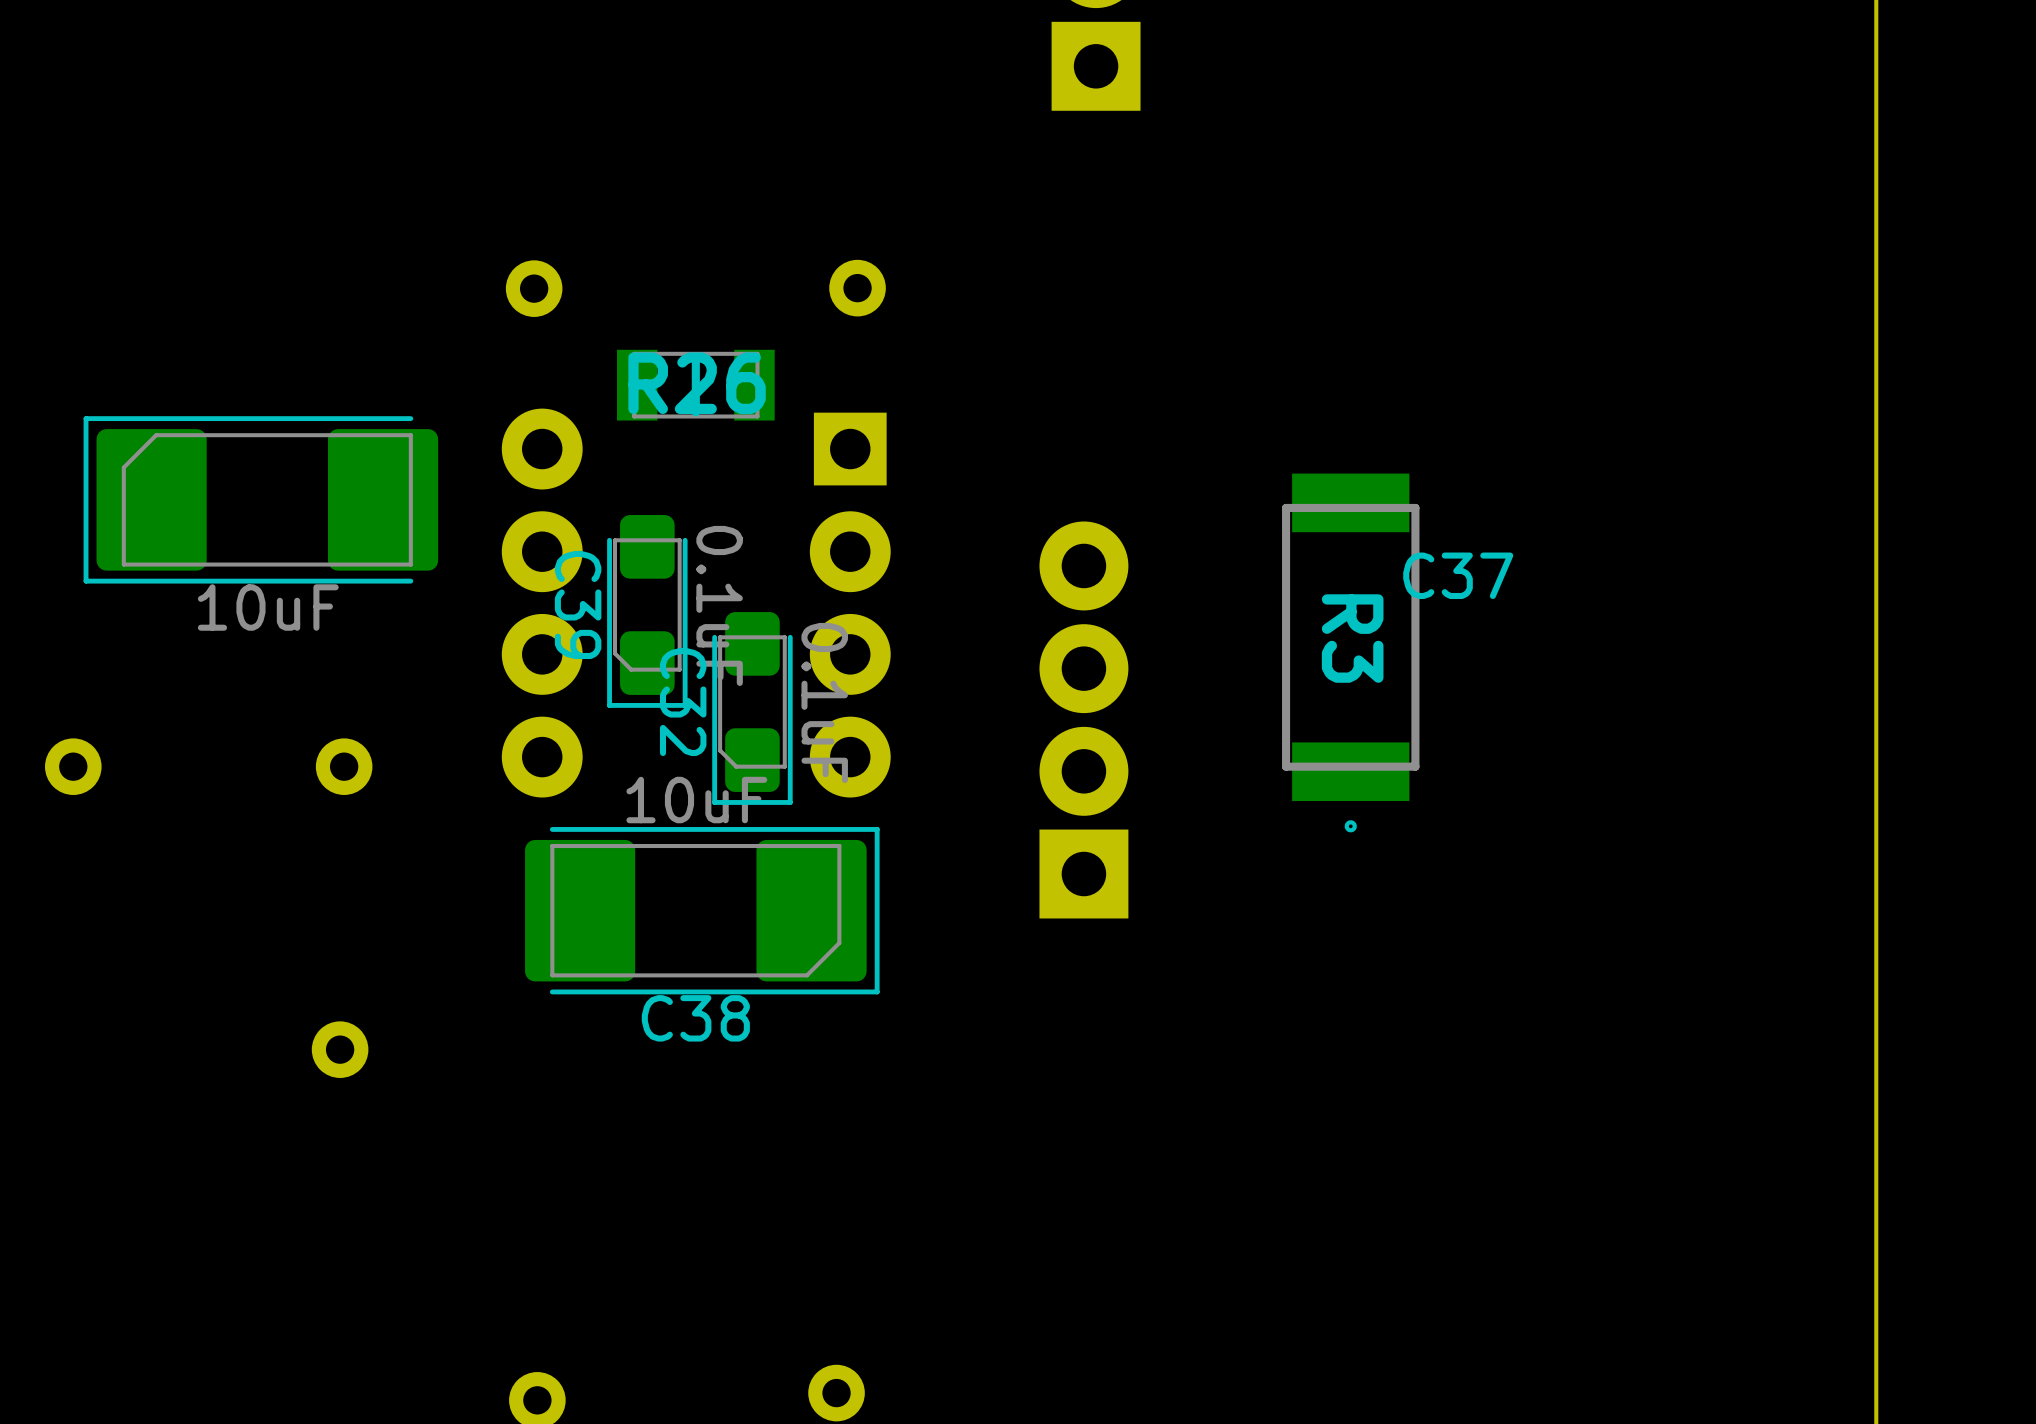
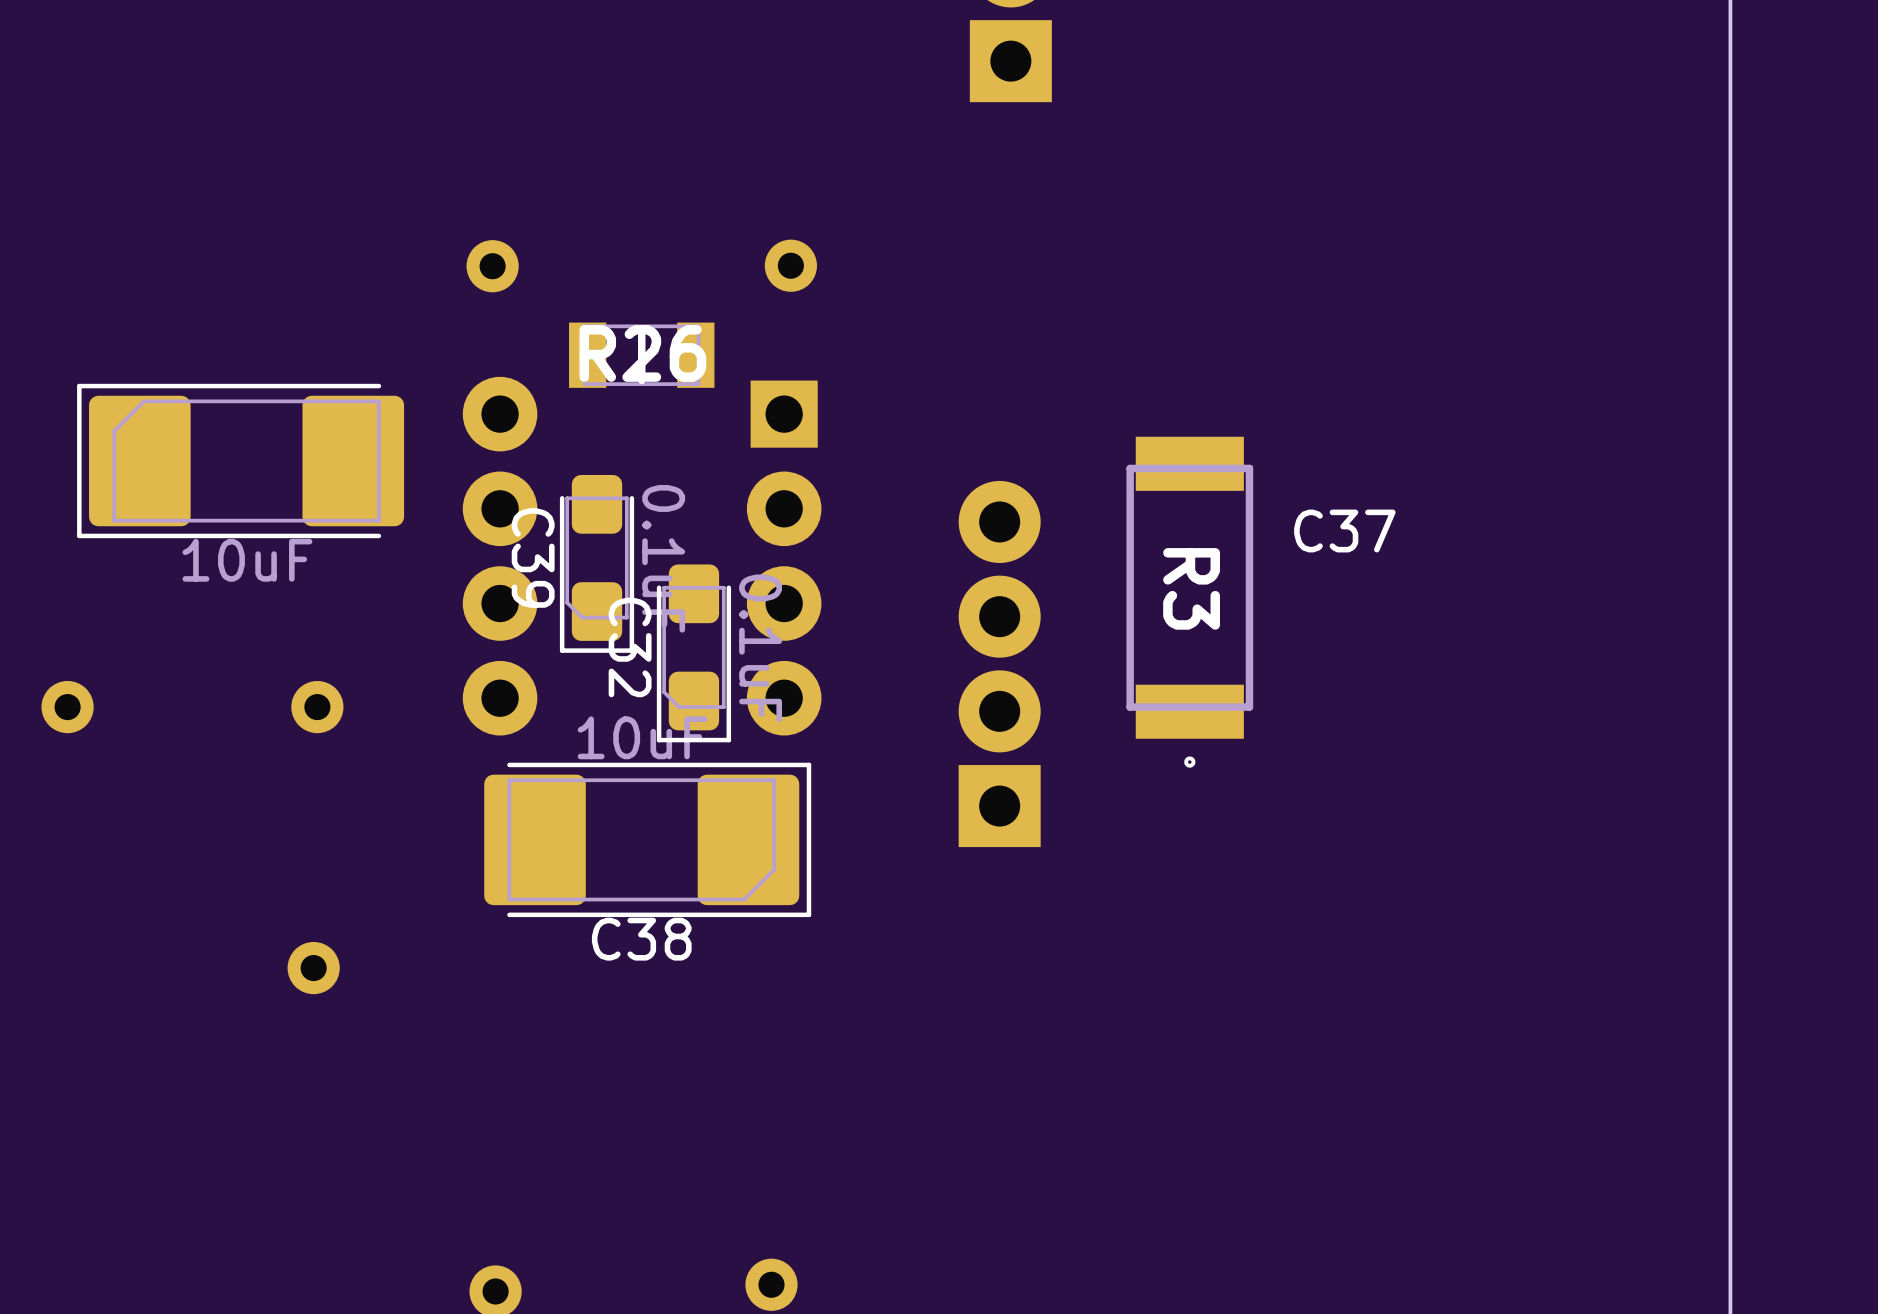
R3 position: (1350, 652) -> (1189, 602)

